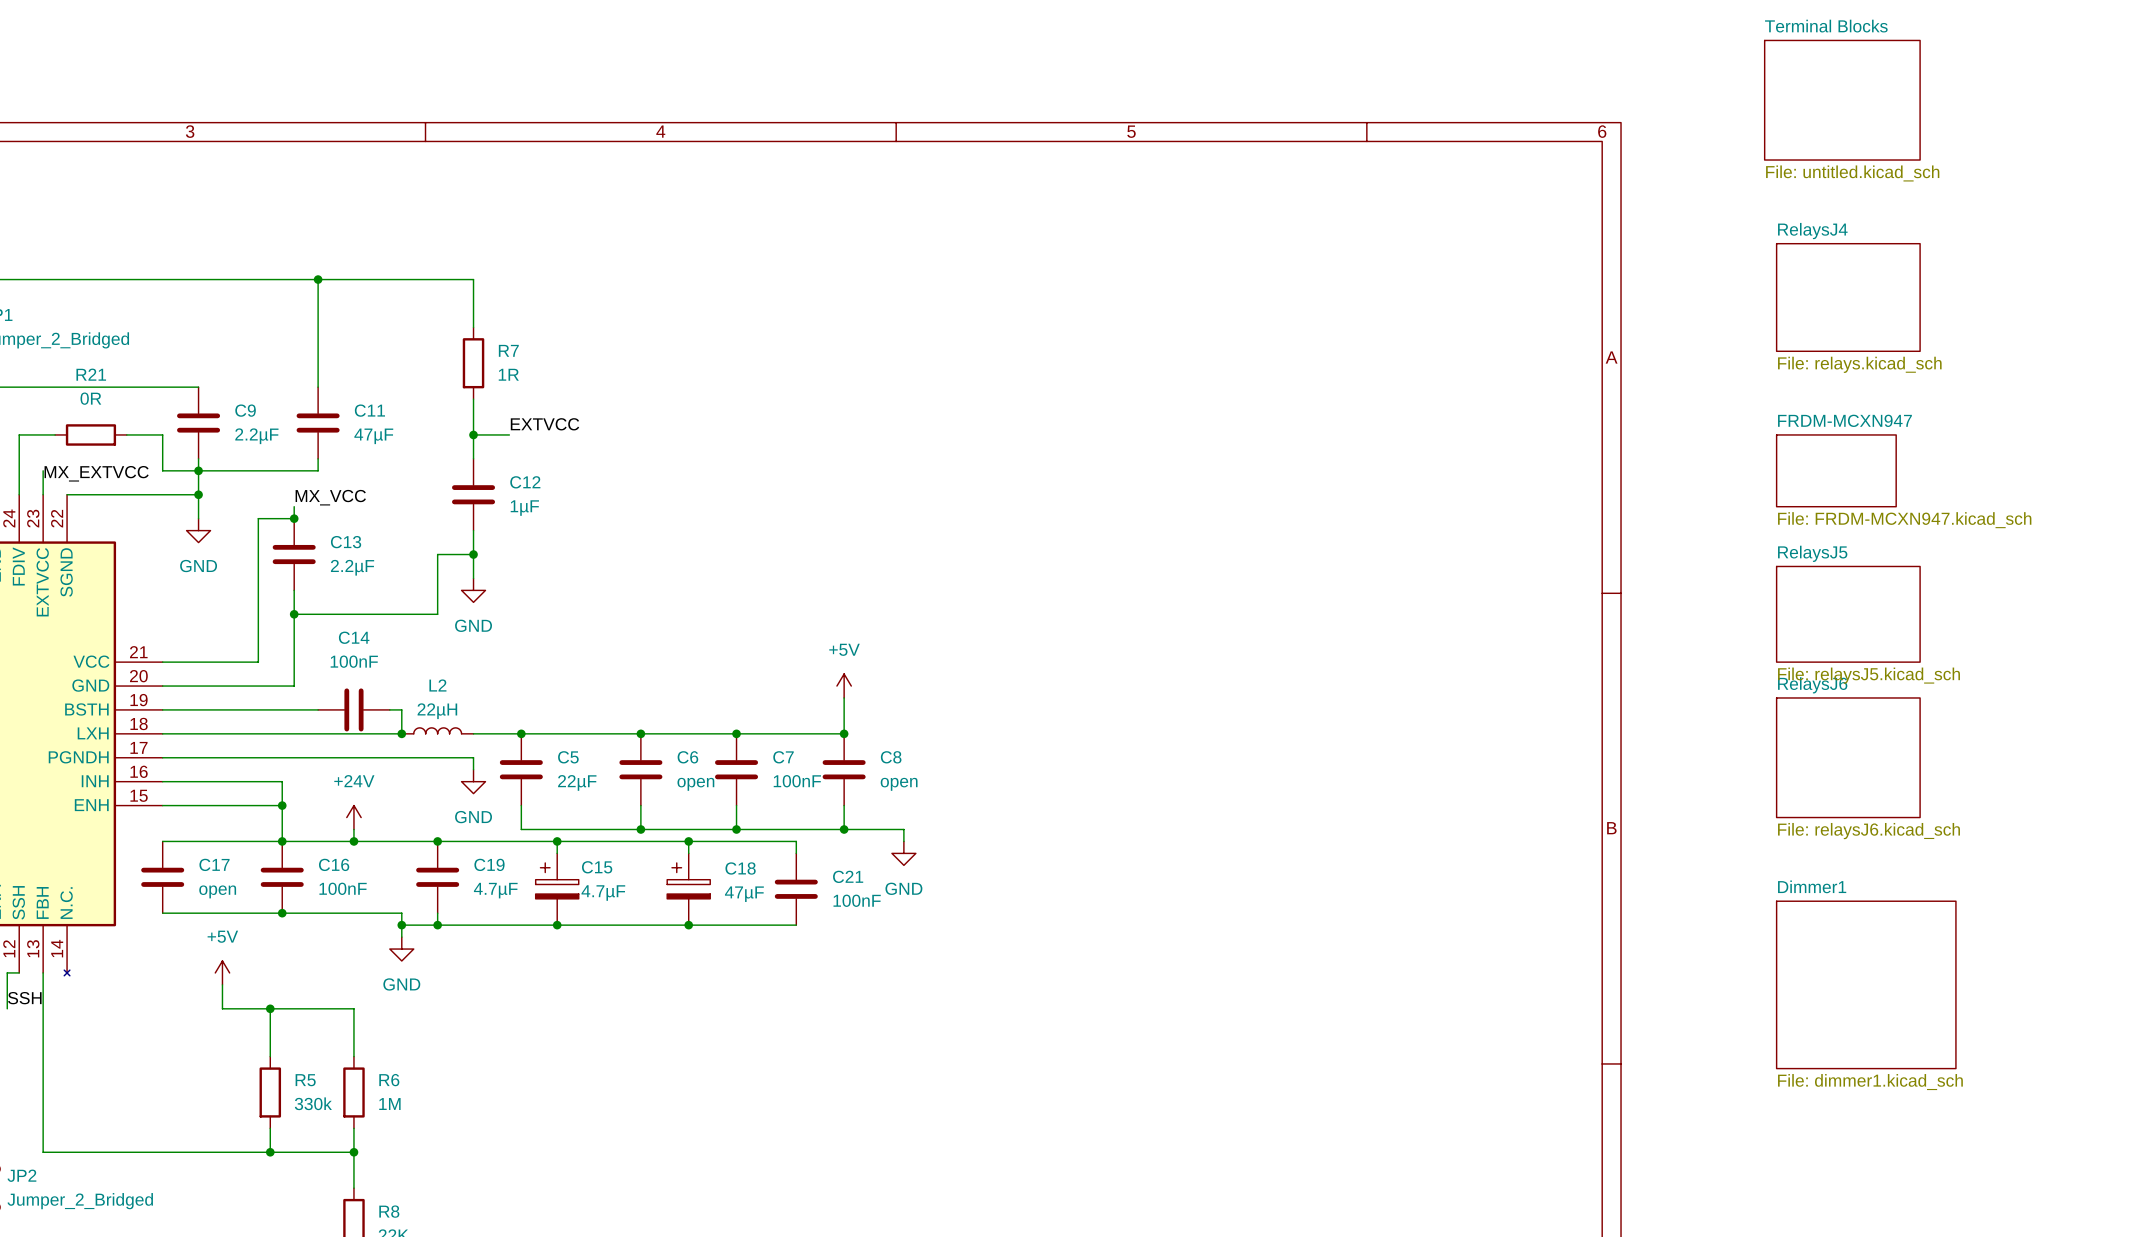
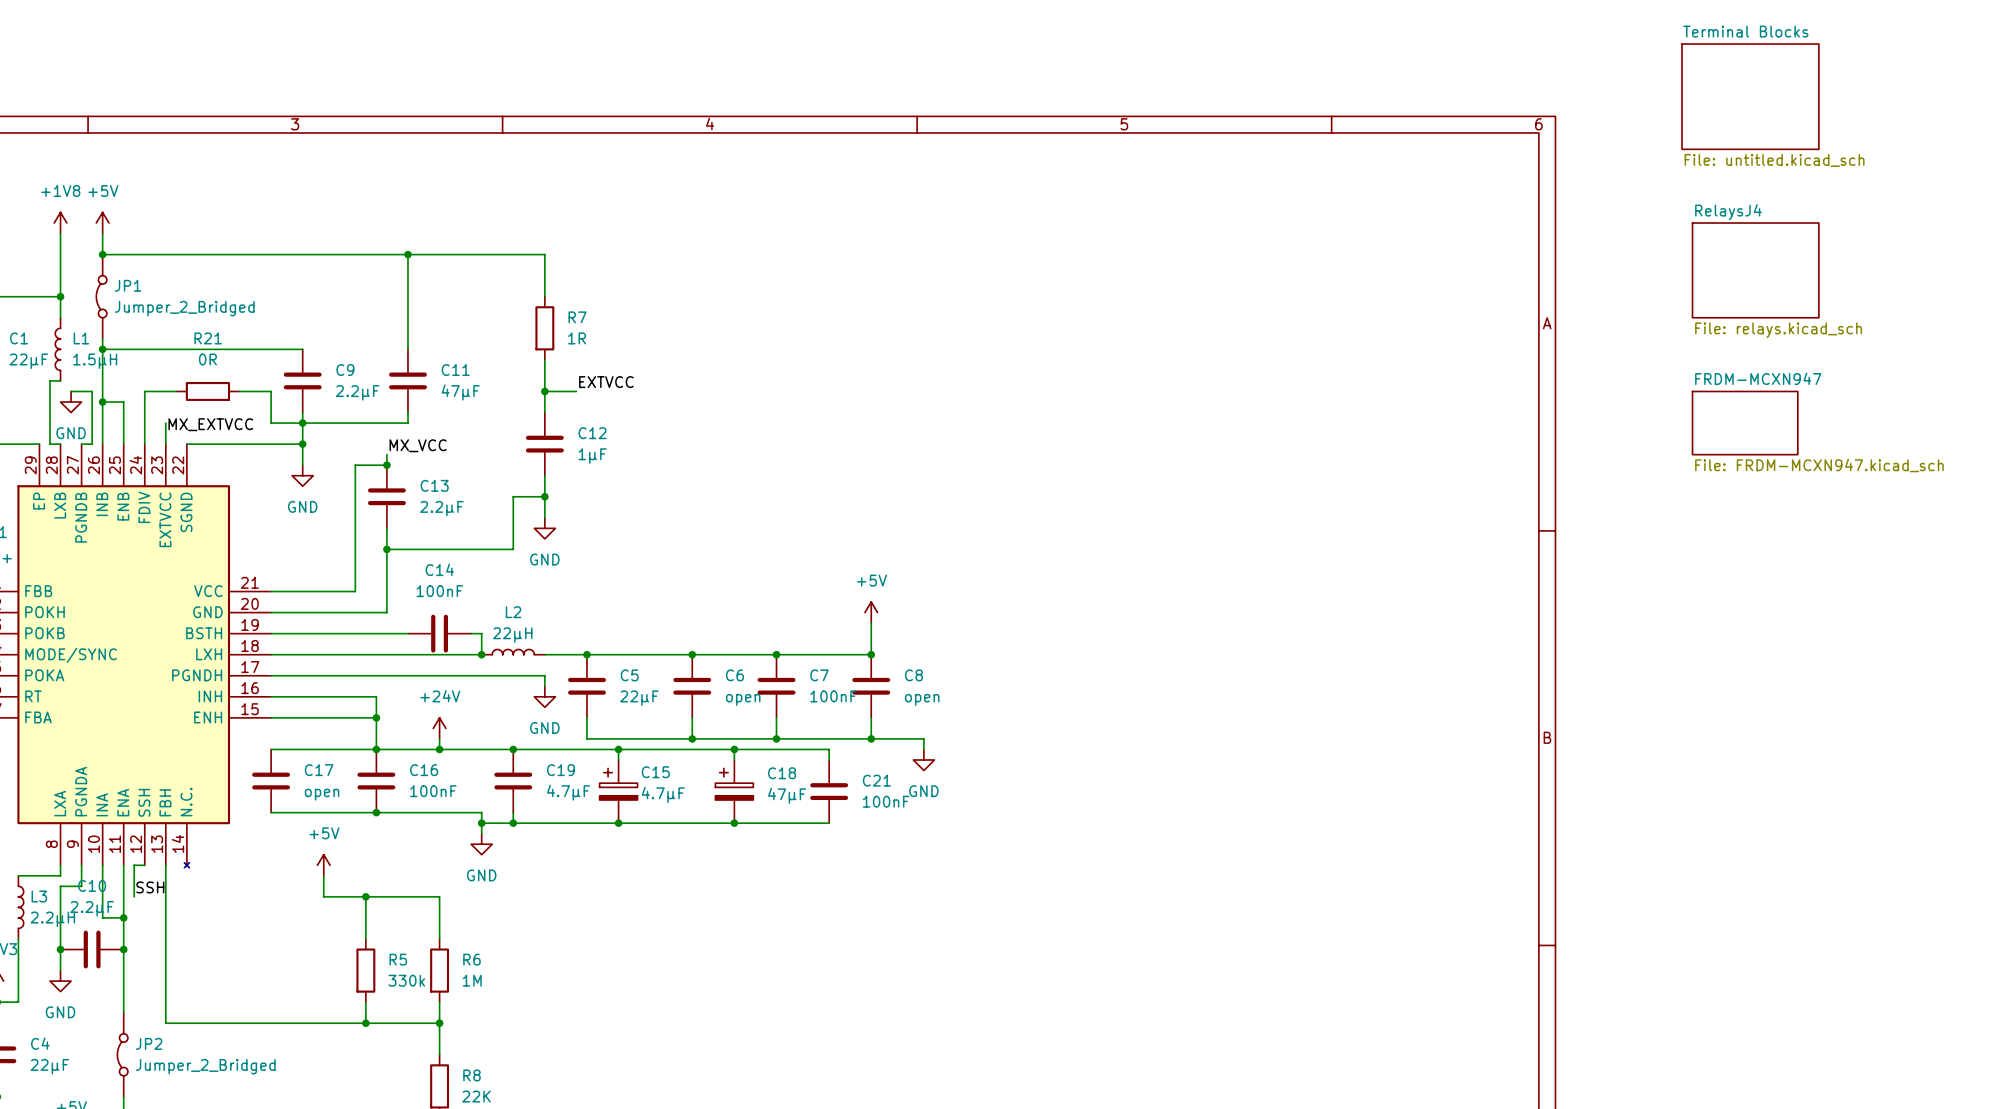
sheet RelaysJ5: File: relaysJ5.kicad_sch (1848, 614) -> none
sheet RelaysJ6: File: relaysJ6.kicad_sch (1848, 757) -> none
sheet Dimmer1: File: dimmer1.kicad_sch (1866, 984) -> none

